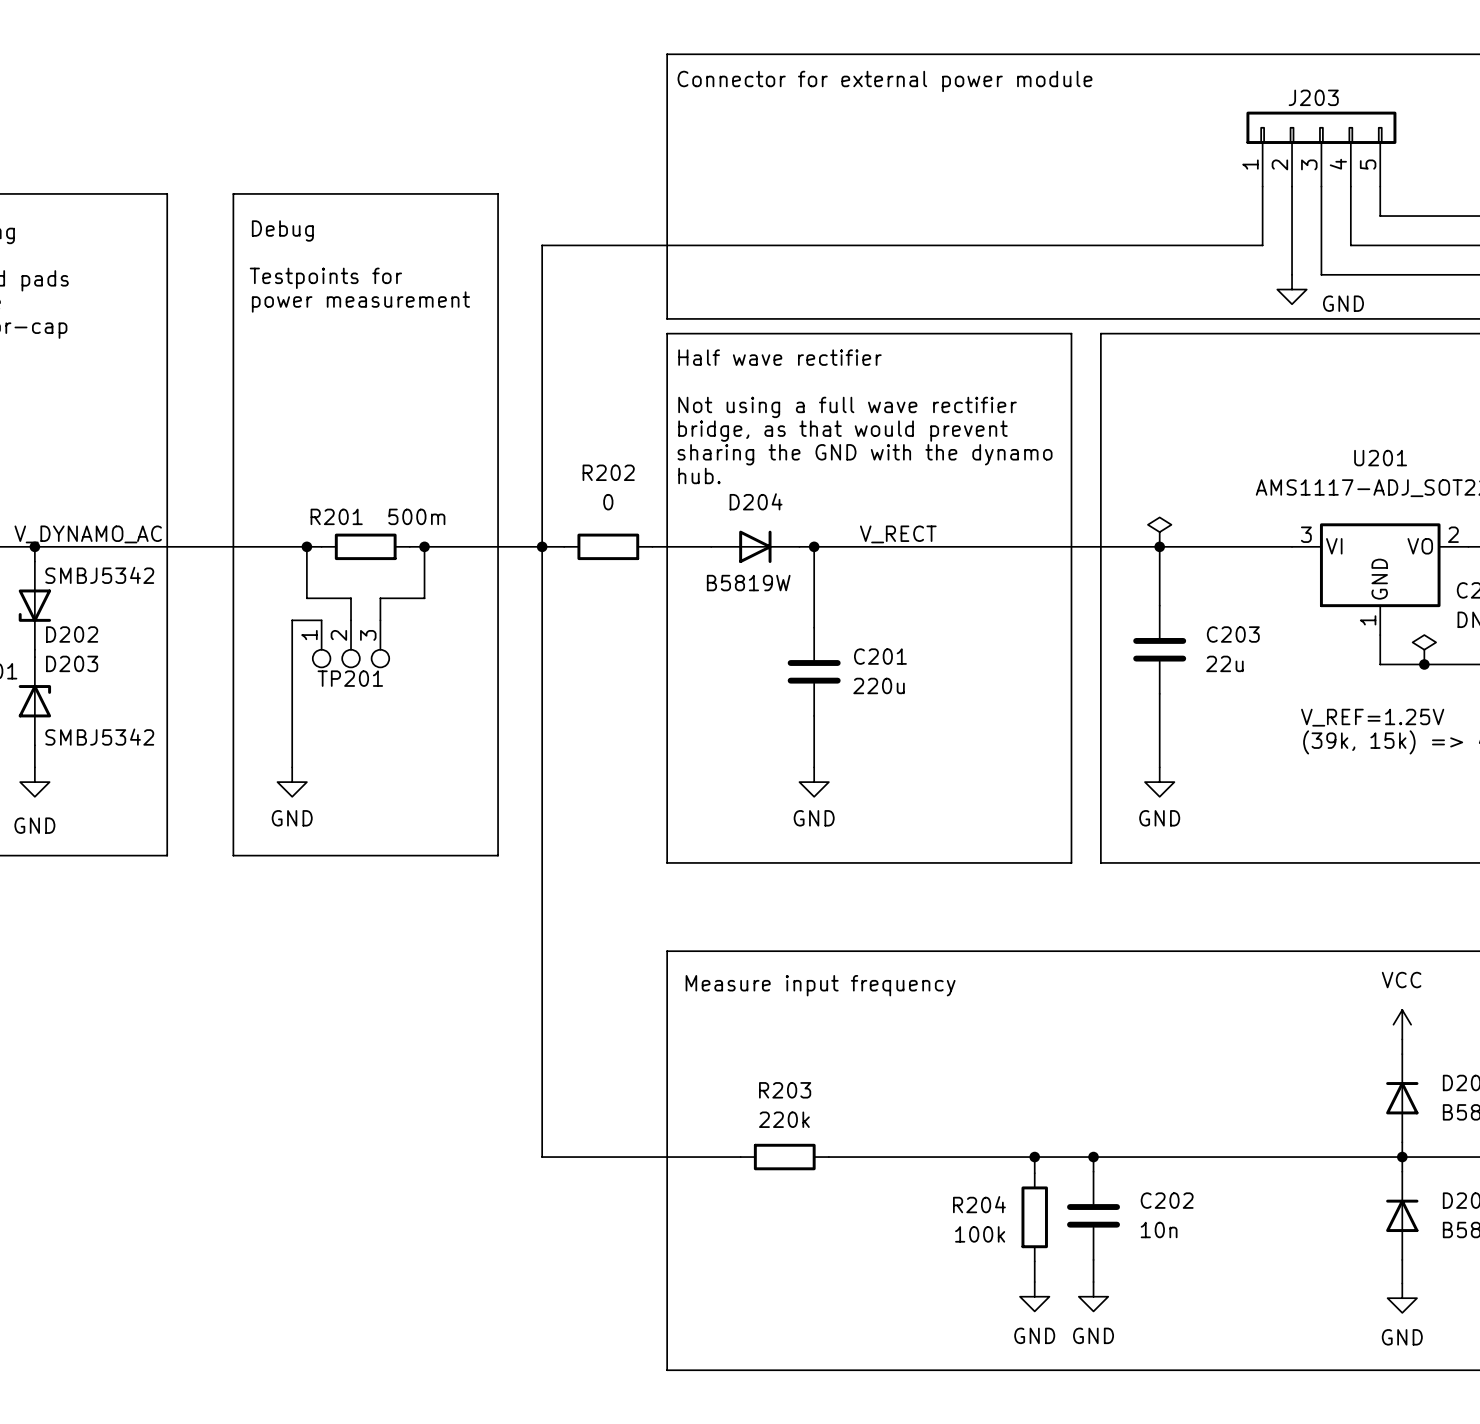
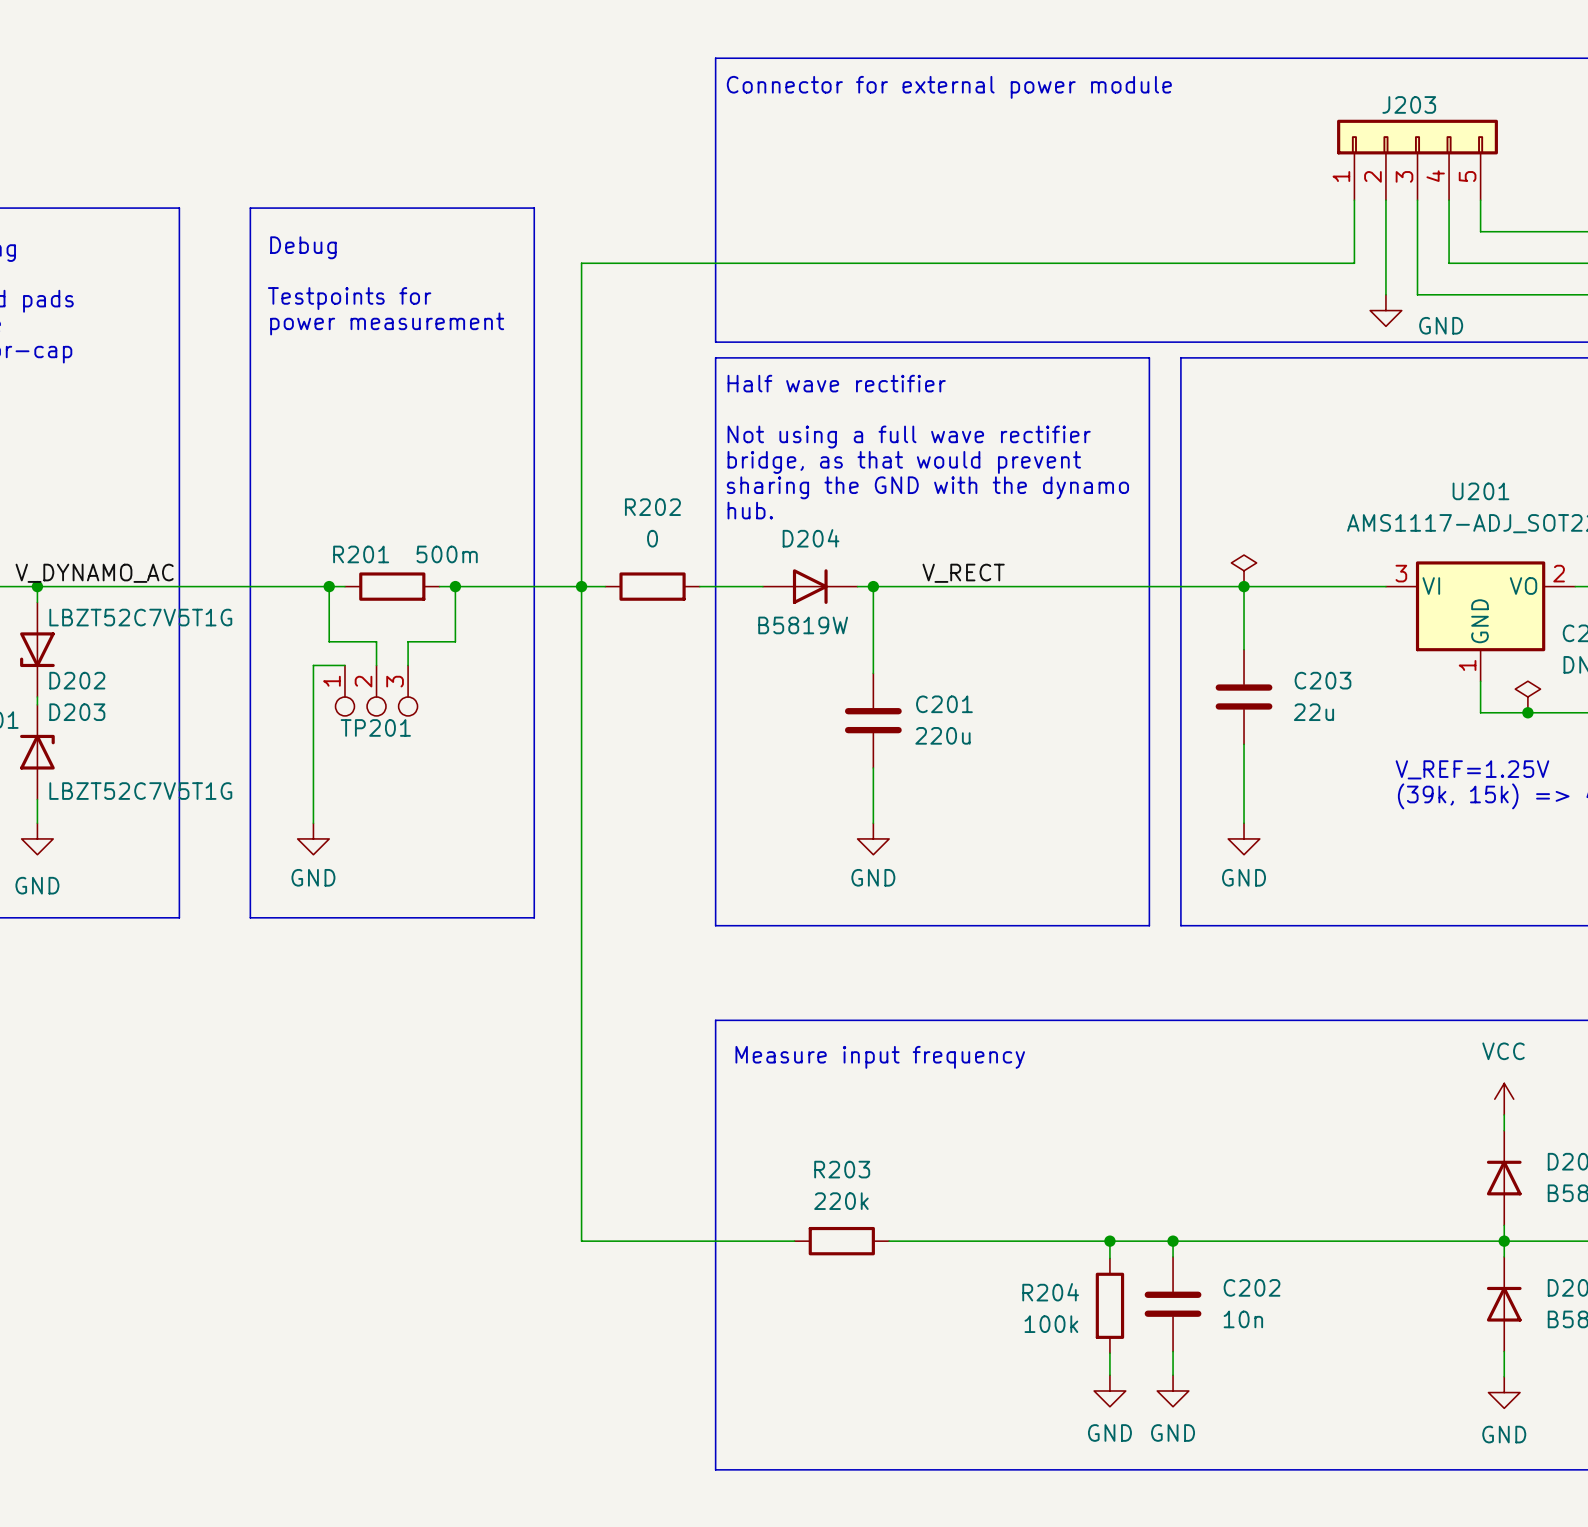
D202 value: SMBJ5342 (99, 575) -> LBZT52C7V5T1G (140, 617)
D203 value: SMBJ5342 (99, 737) -> LBZT52C7V5T1G (140, 791)

